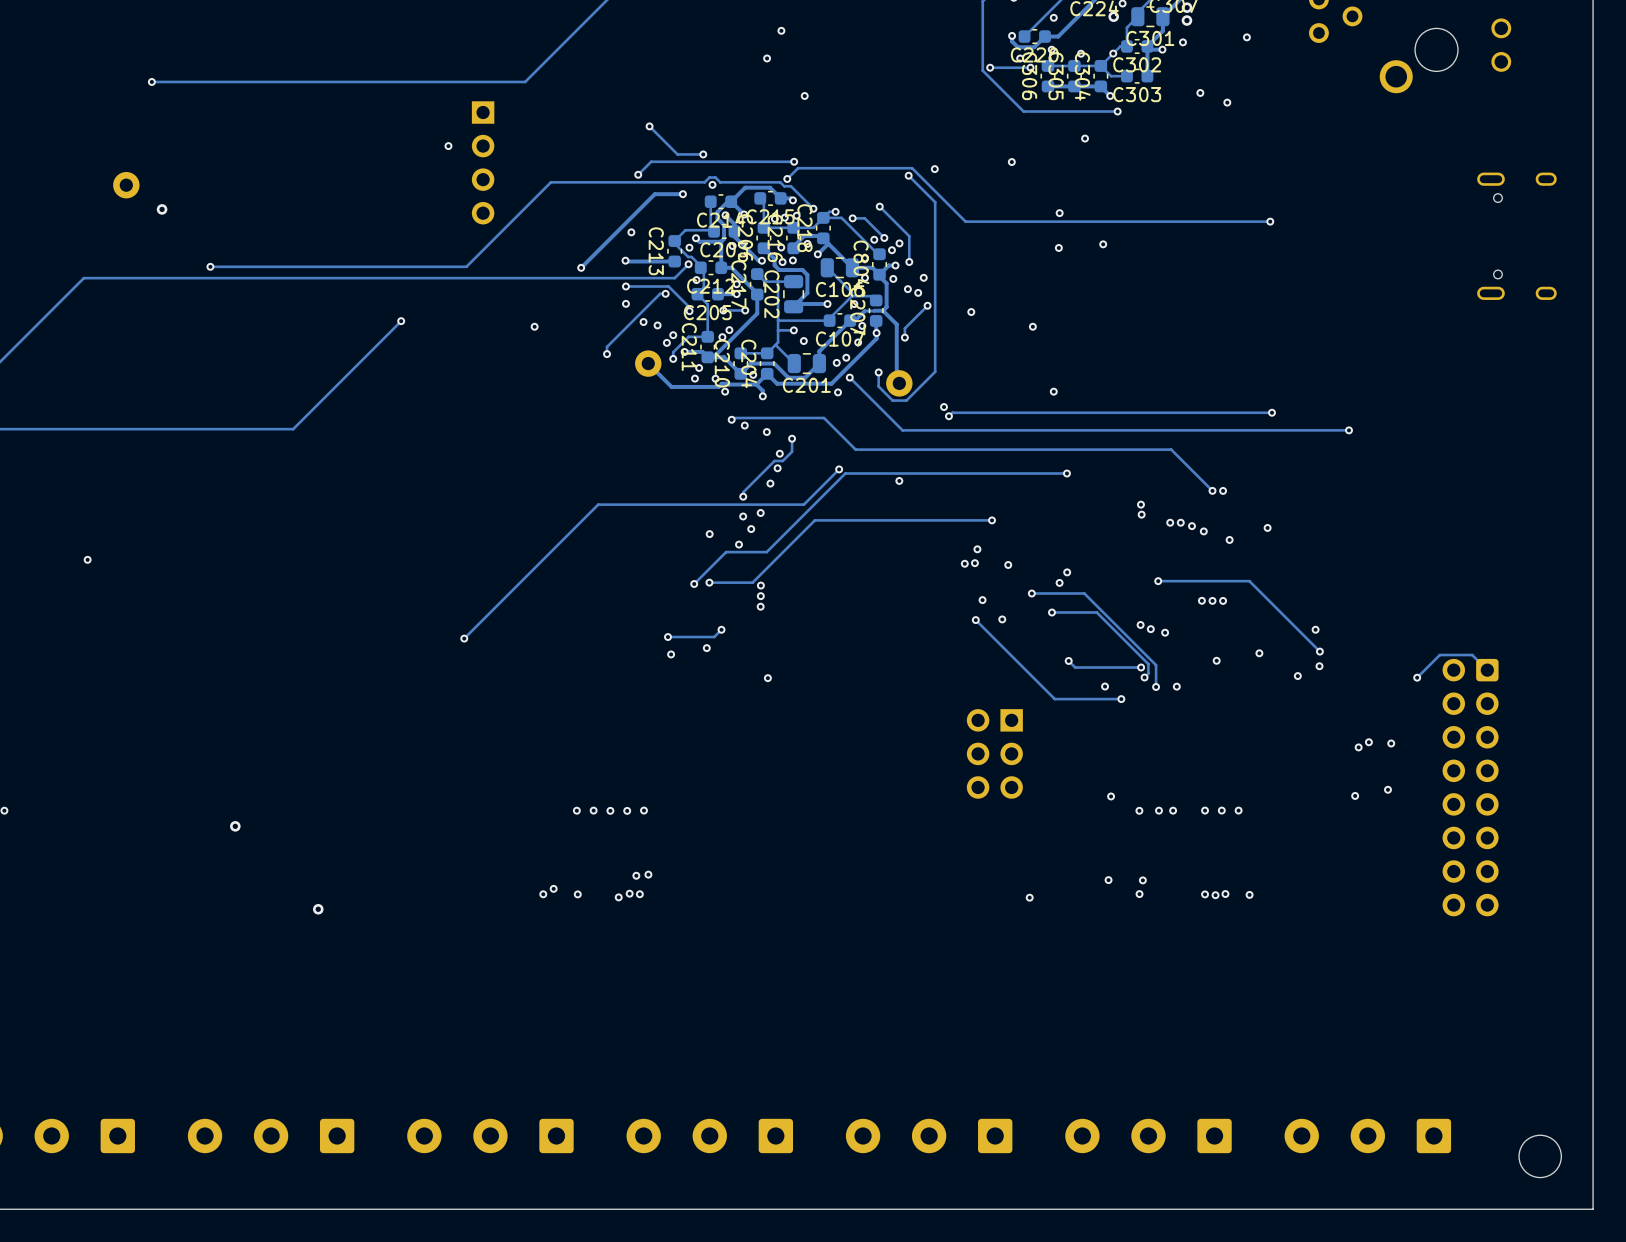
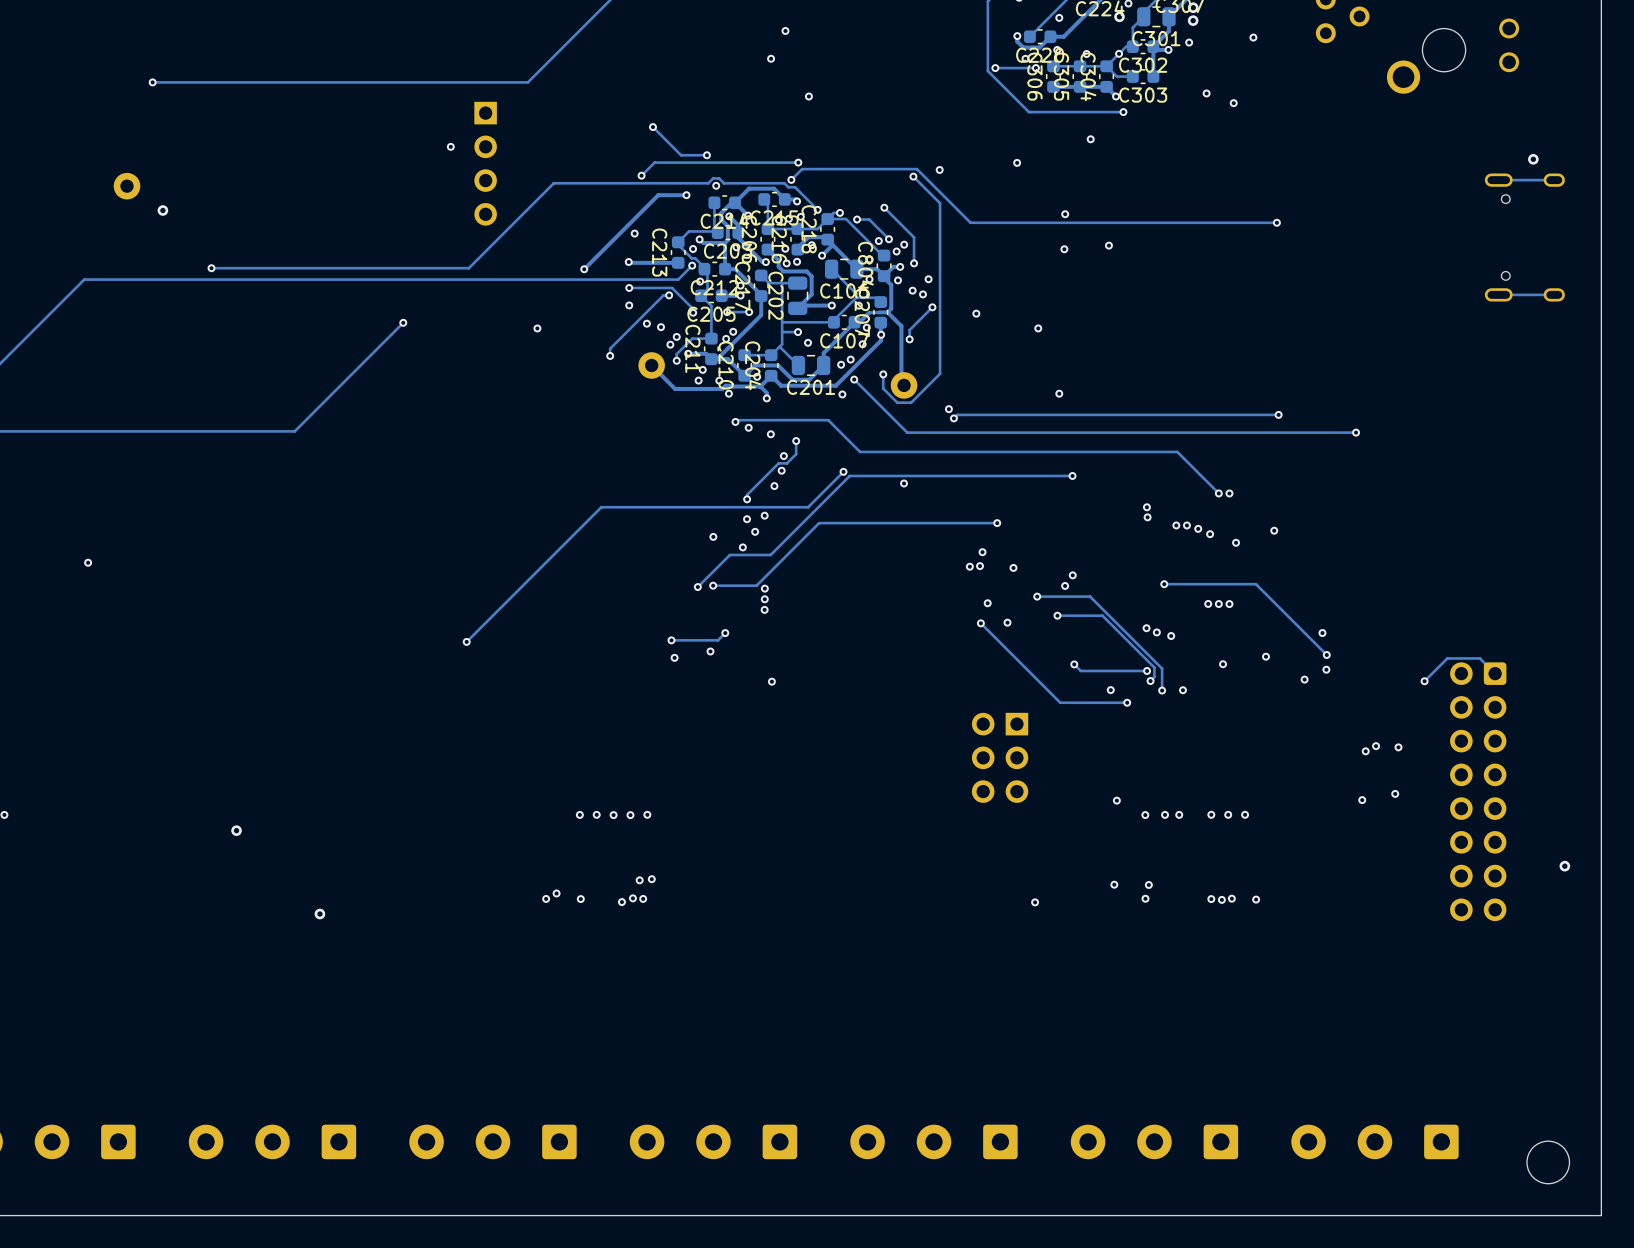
via: none -> (1533, 159)
track: none -> (1554, 180) (1498, 180)
track: none -> (1554, 294) (1498, 294)
via: none -> (1564, 866)

